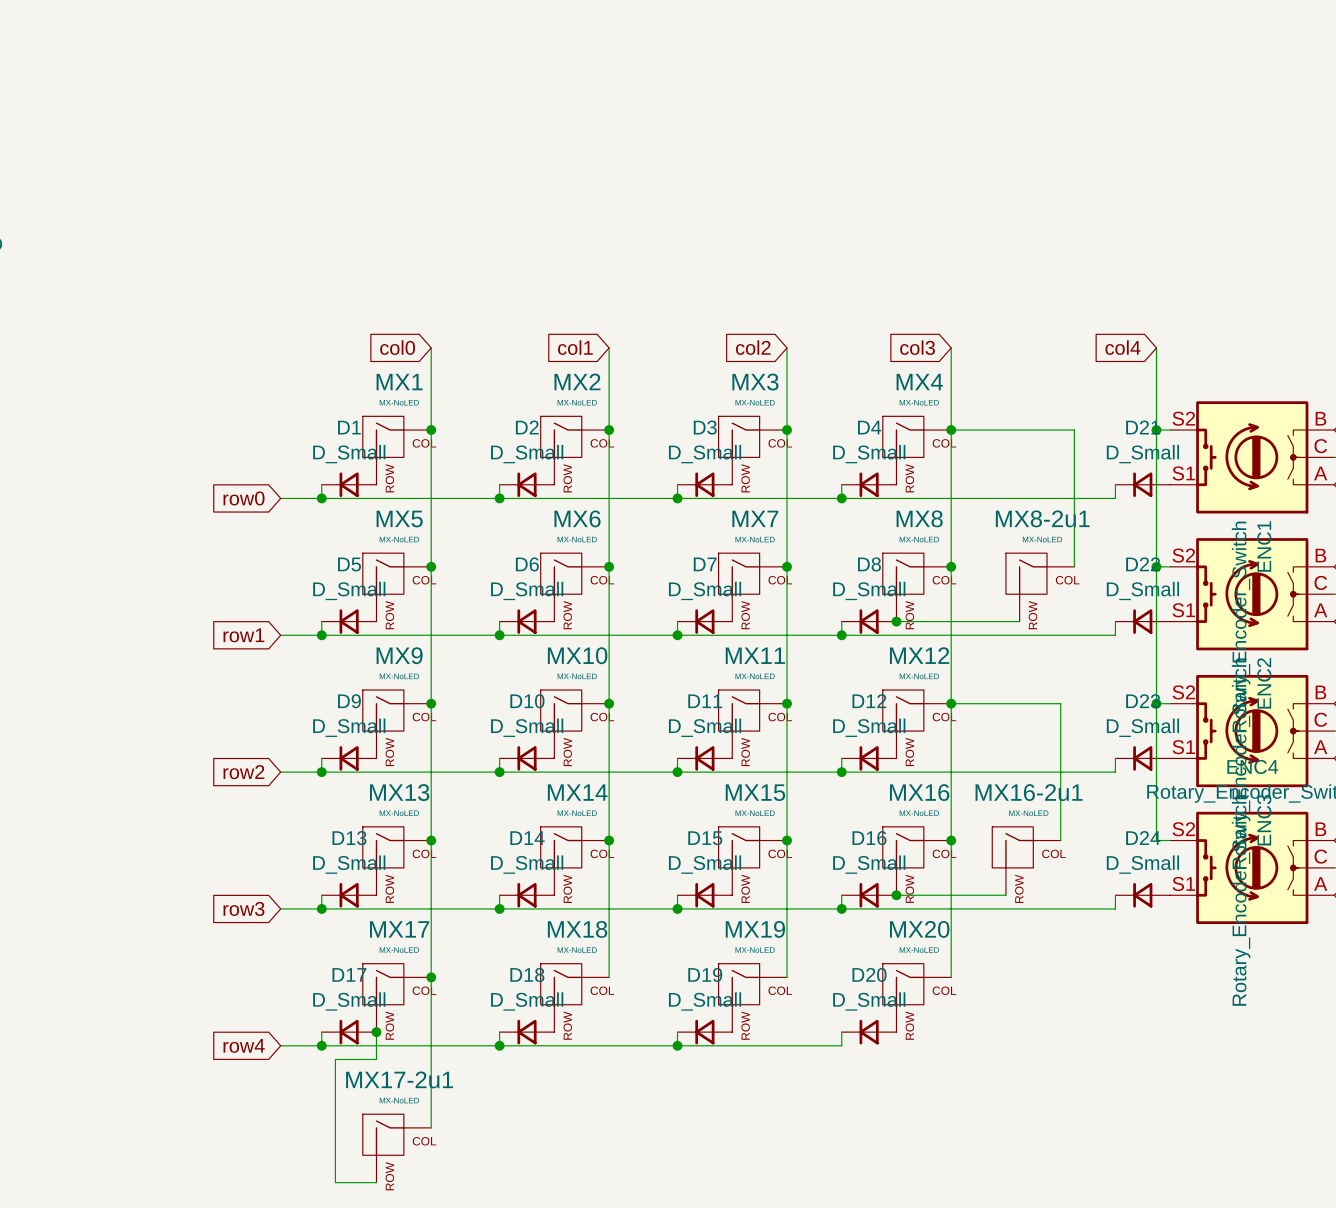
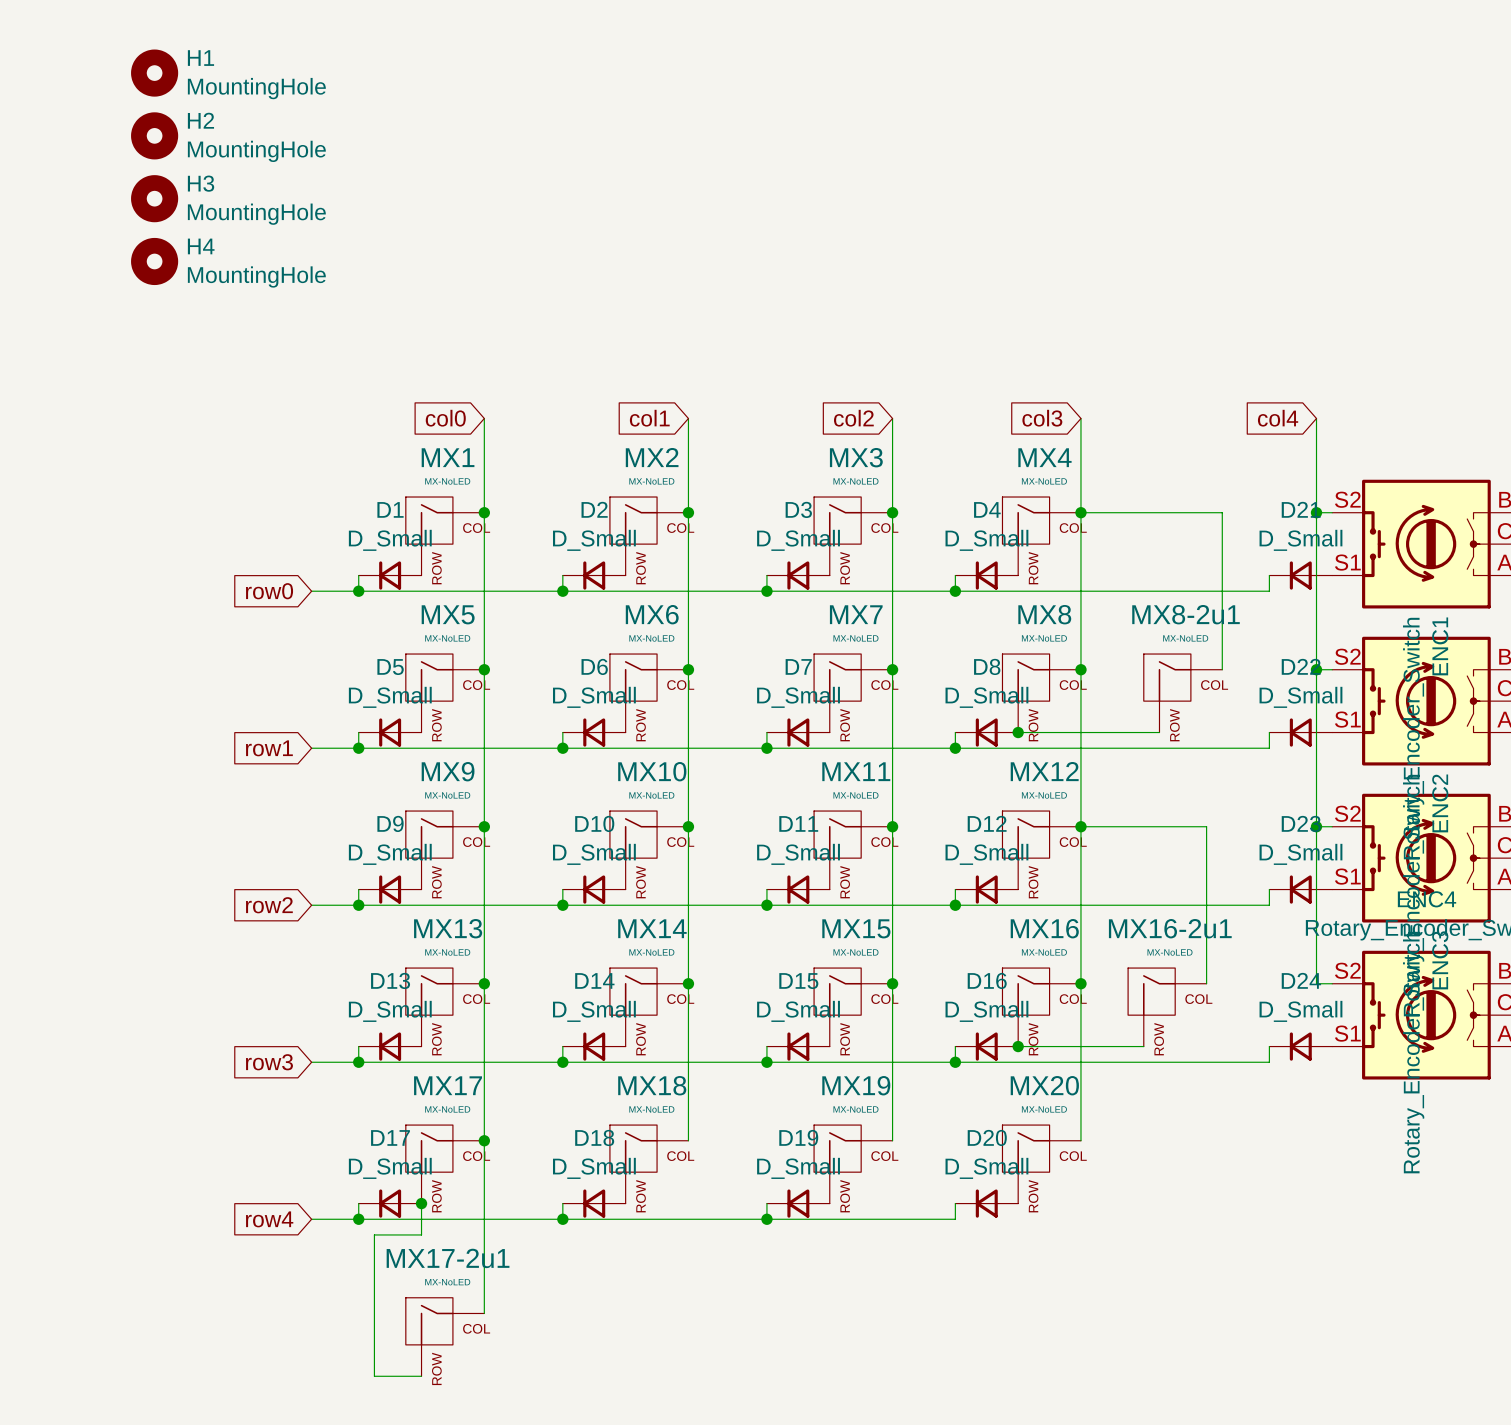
H1: none -> MountingHole (154, 73)
H2: none -> MountingHole (154, 135)
H3: none -> MountingHole (154, 198)
H4: none -> MountingHole (154, 261)

